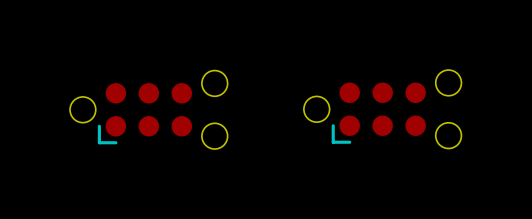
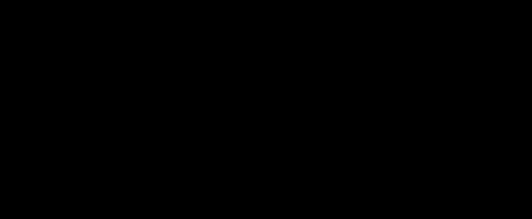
part: (148, 109) -> none
part: (382, 109) -> none

